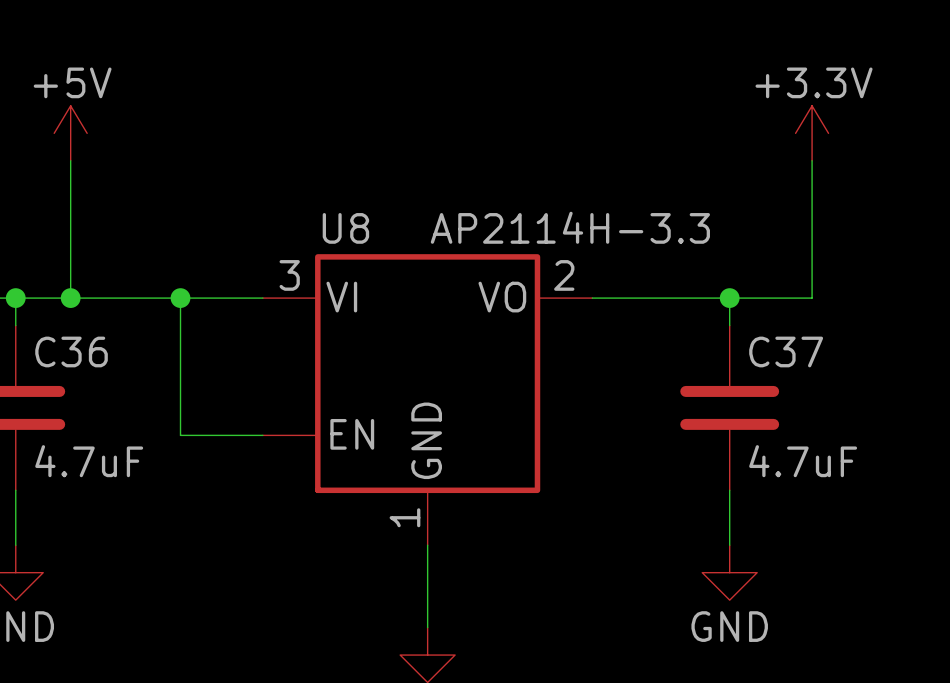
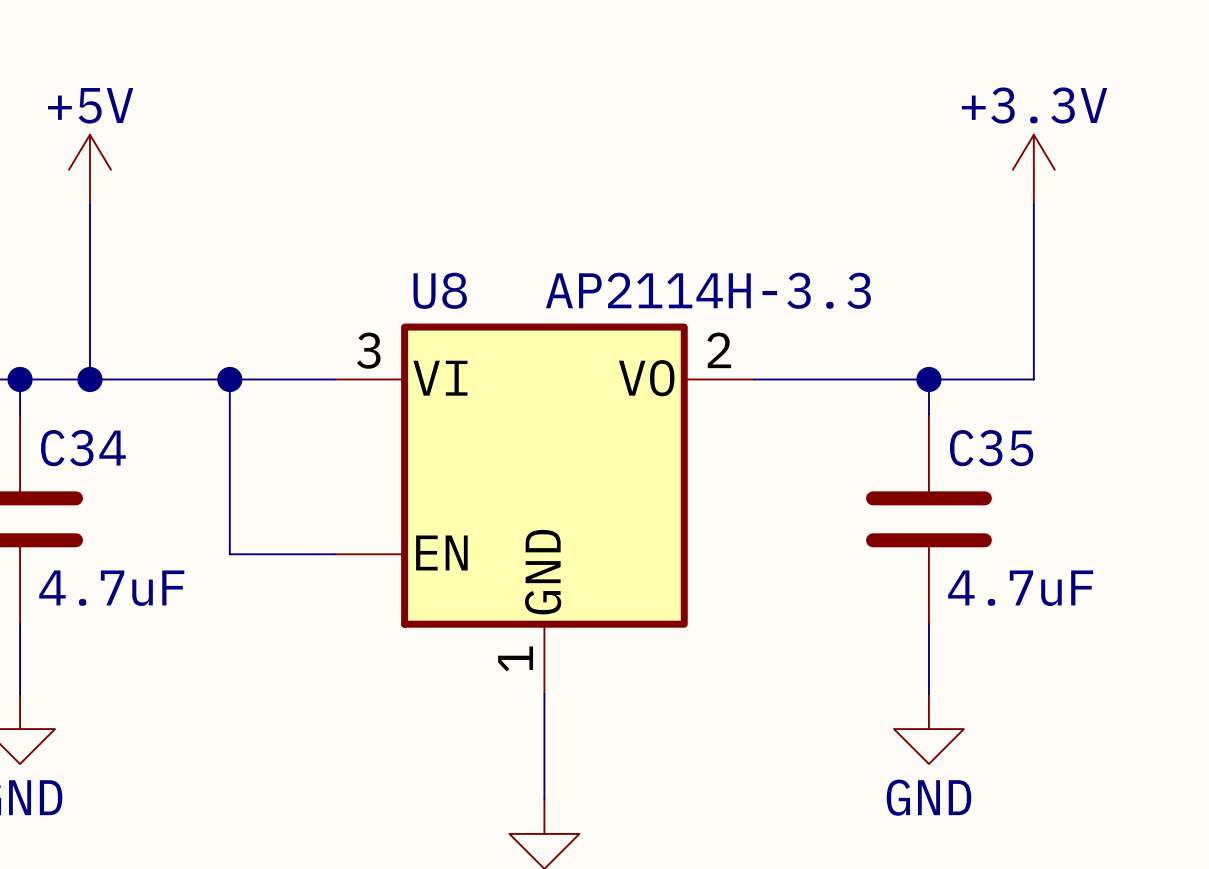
C36 name: C36 (71, 351) -> C34 (83, 448)
C37 name: C37 (786, 351) -> C35 (991, 448)

